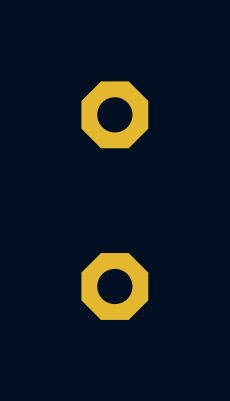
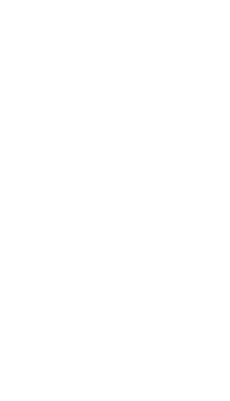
part: (114, 114) -> none
part: (114, 286) -> none

